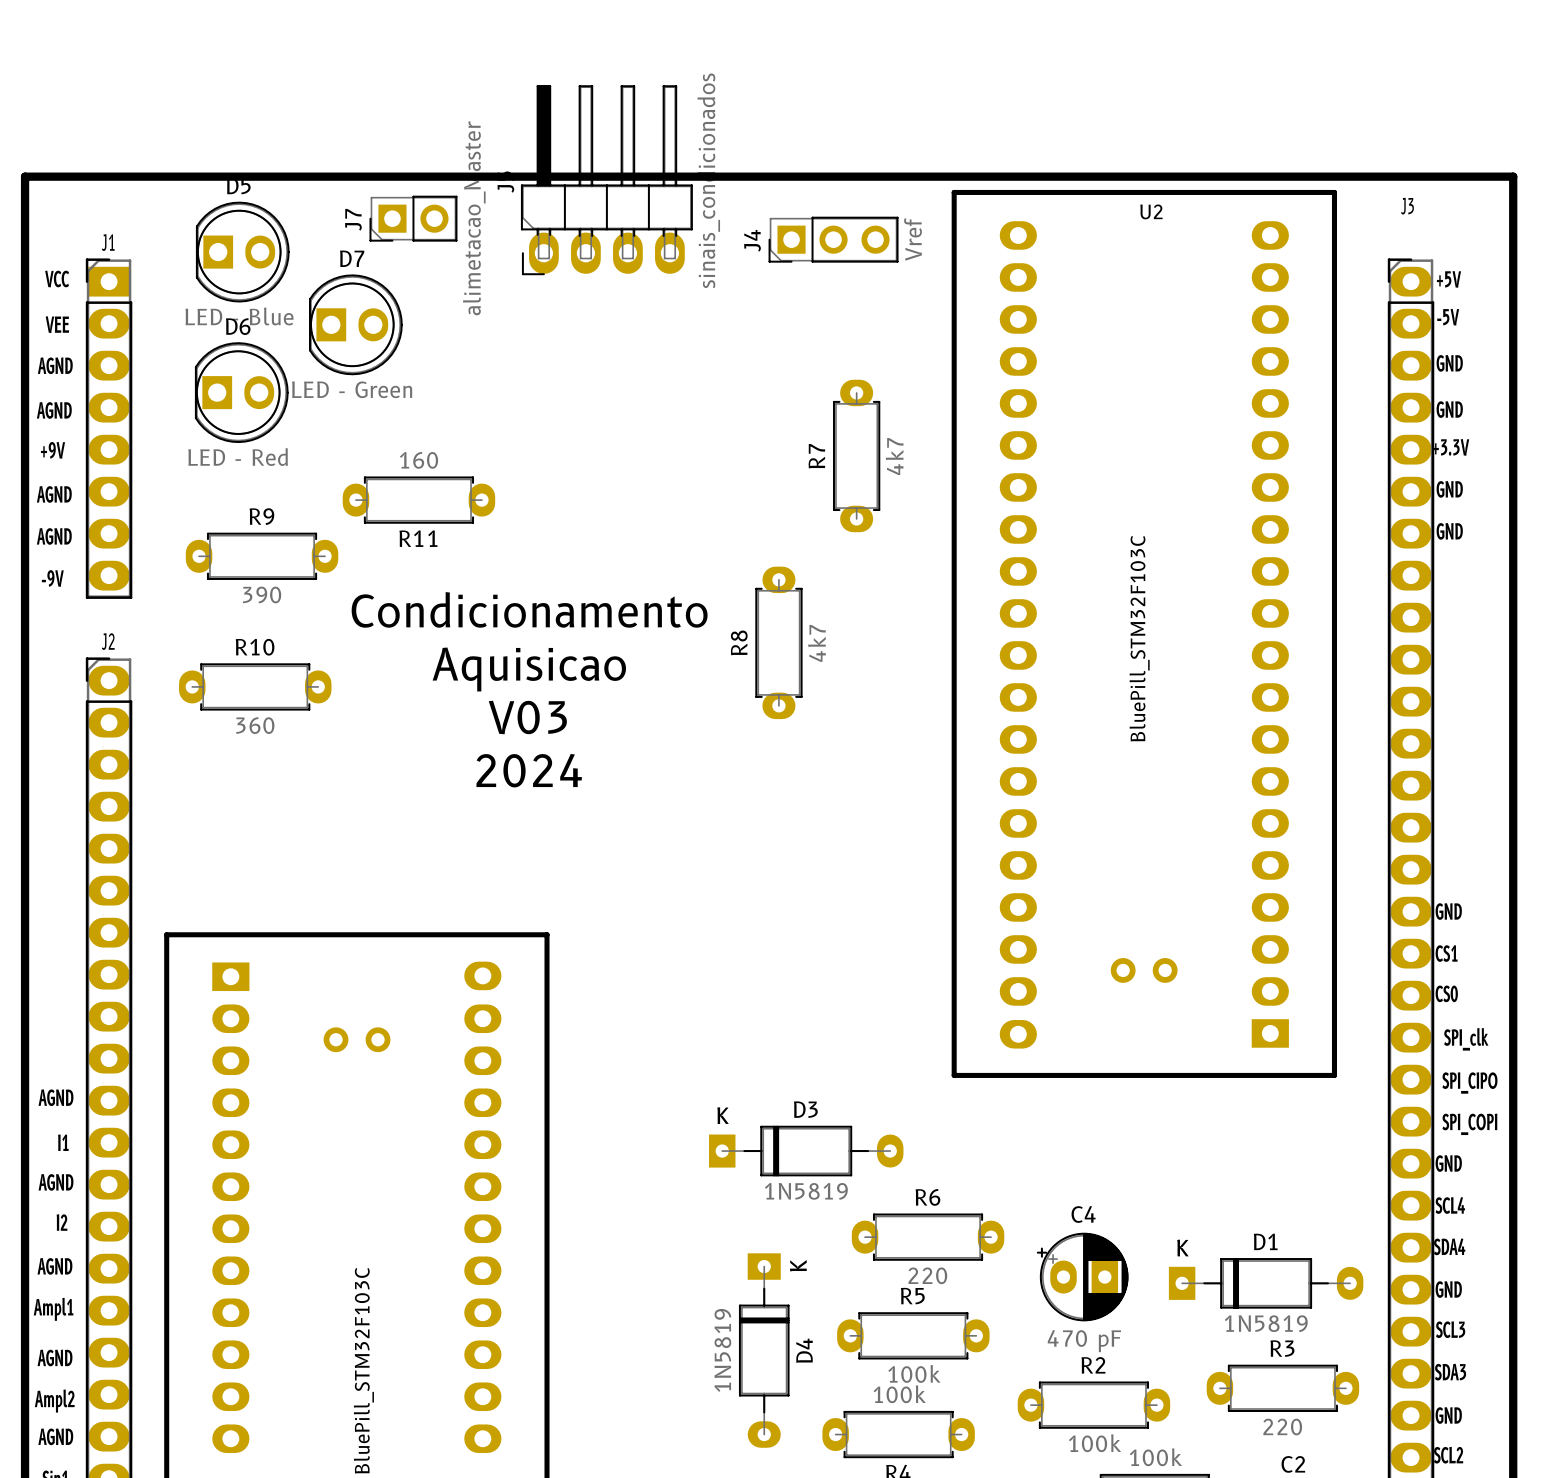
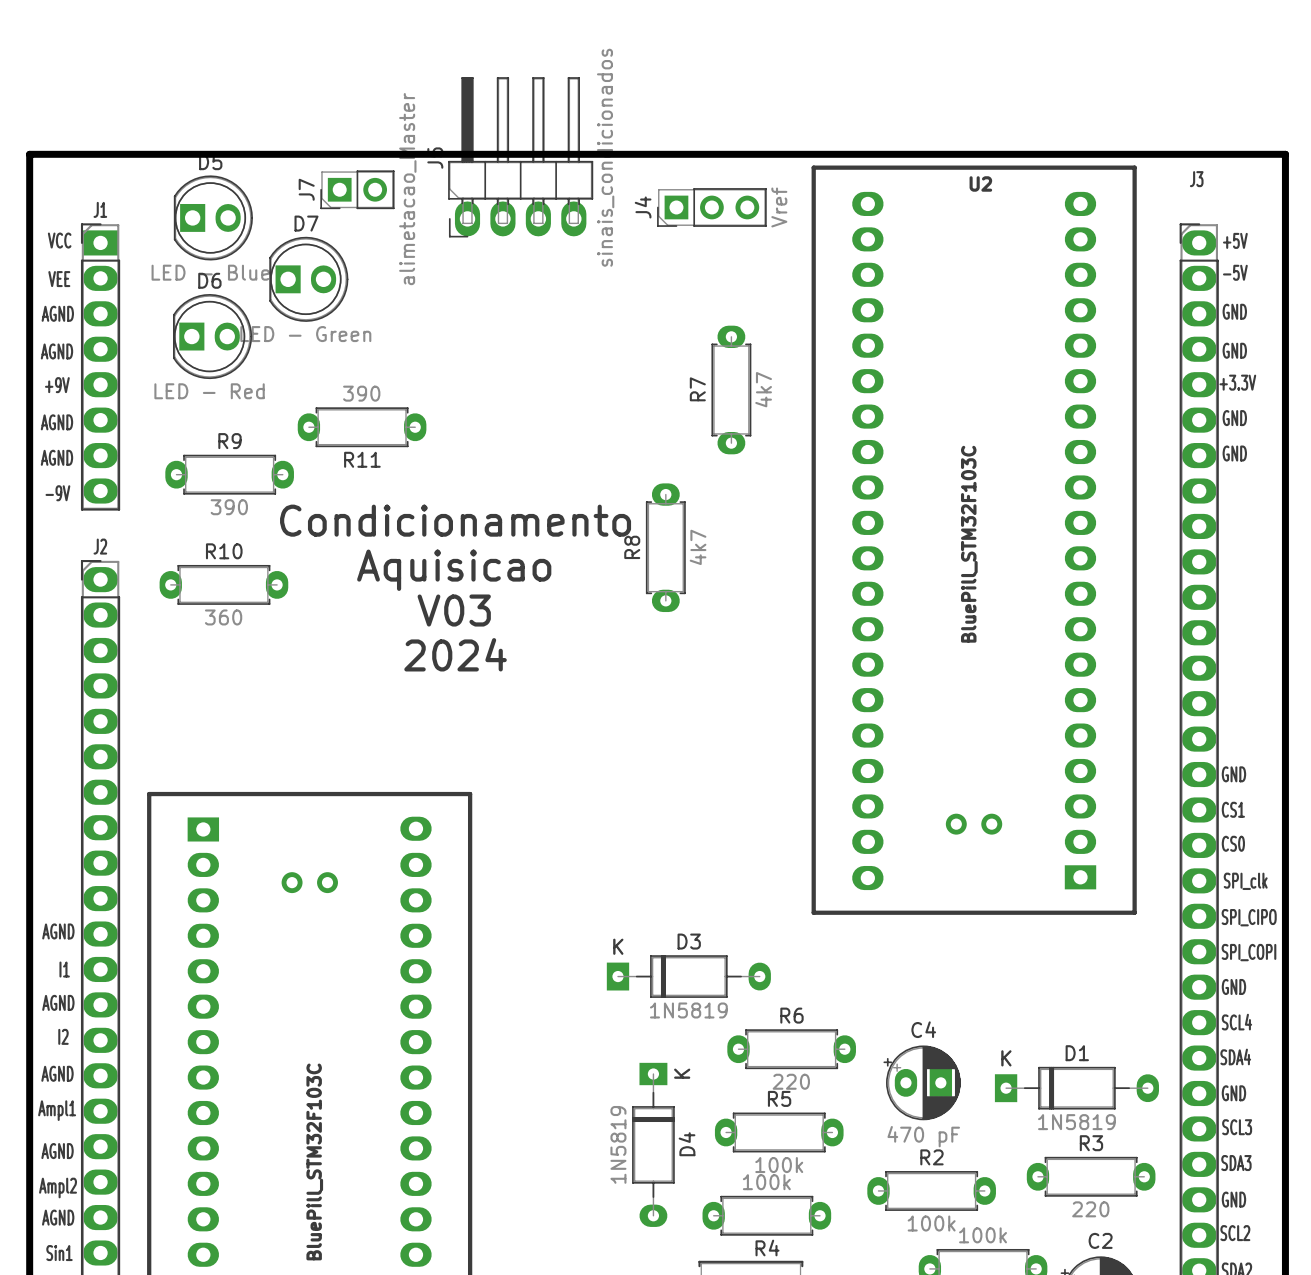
R11 value: 160 (418, 460) -> 390 (361, 393)

